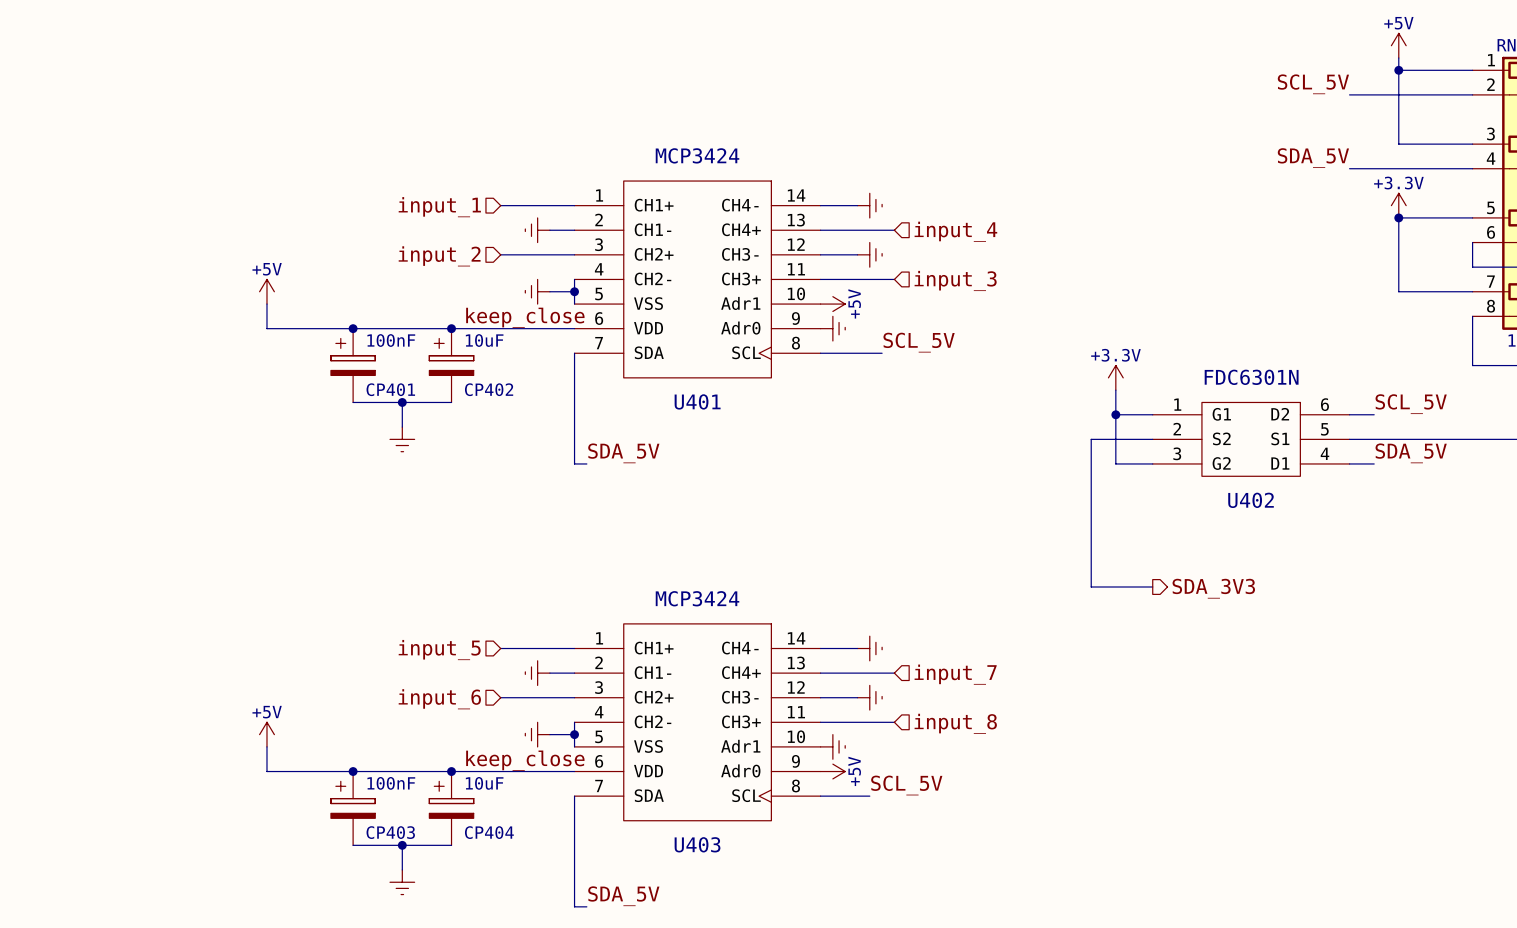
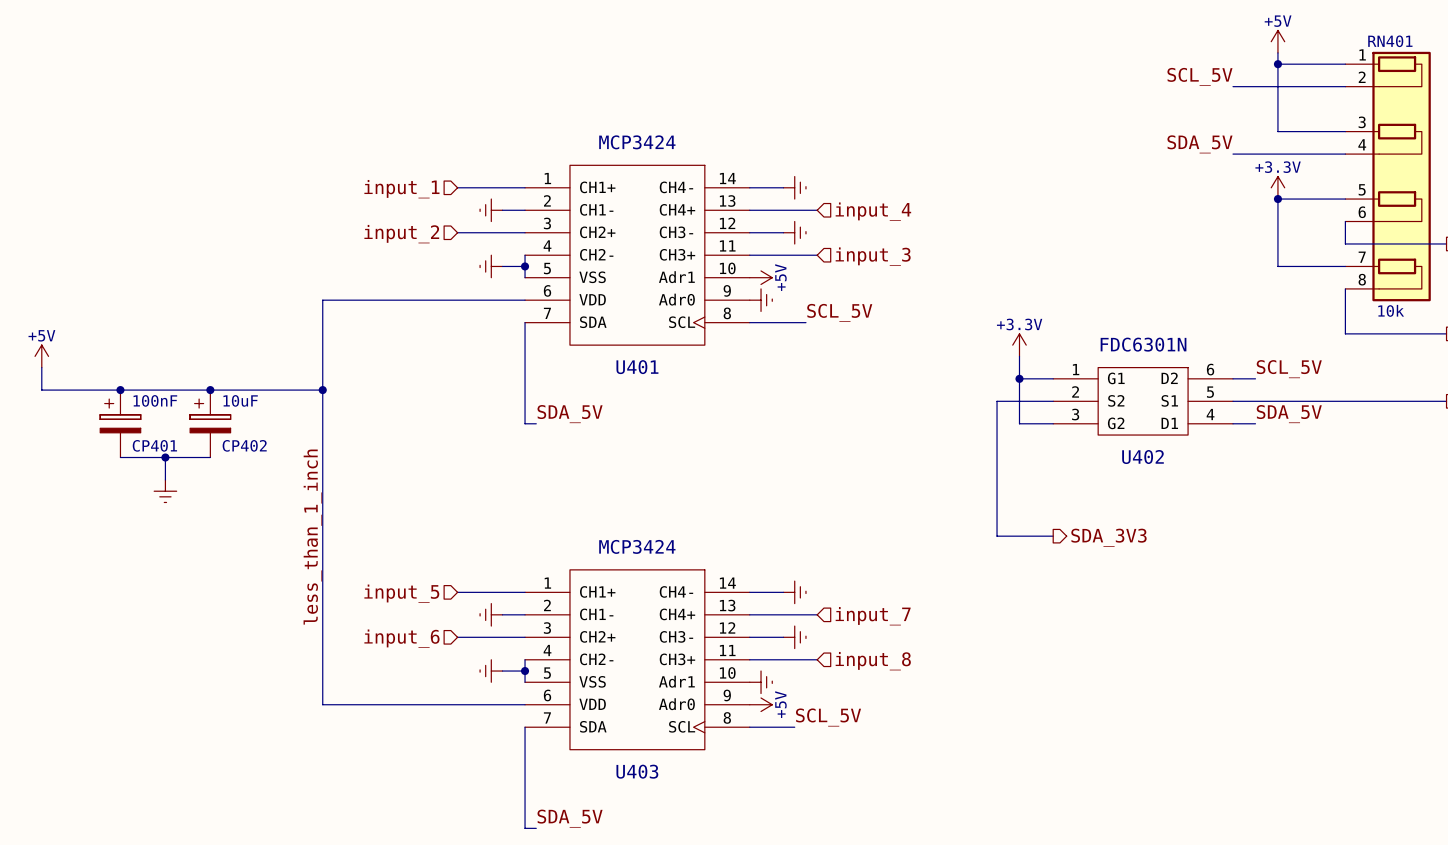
power symbol: +5V (266, 291) -> none
wire: (266, 304) (266, 328) (353, 328) -> none
label: keep_close (525, 317) -> none
junction: (353, 328) -> none
junction: (451, 328) -> none
CP401 position: (353, 365) -> (120, 423)
CP402 position: (451, 365) -> (210, 423)
power symbol: none -> +5V (41, 356)
wire: none -> (41, 367) (41, 390) (322, 390)
wire: (353, 402) (451, 402) -> none
wire: (402, 402) (402, 427) -> none
junction: (402, 402) -> none
junction: none -> (120, 390)
junction: none -> (210, 390)
junction: none -> (322, 390)
power symbol: (402, 439) -> none
wire: none -> (120, 457) (210, 457)
wire: none -> (165, 457) (165, 479)
junction: none -> (165, 457)
power symbol: none -> (165, 491)
label: none -> less_than_1_inch (312, 537)
power symbol: +5V (266, 734) -> none
wire: (266, 746) (266, 771) (353, 771) -> (322, 300) (322, 704)
label: keep_close (525, 760) -> none
junction: (353, 771) -> none
junction: (451, 771) -> none
CP403: 100nF (353, 808) -> none
CP404: 10uF (451, 808) -> none
wire: (353, 845) (451, 845) -> none
wire: (402, 845) (402, 869) -> none
junction: (402, 845) -> none
power symbol: (402, 882) -> none

